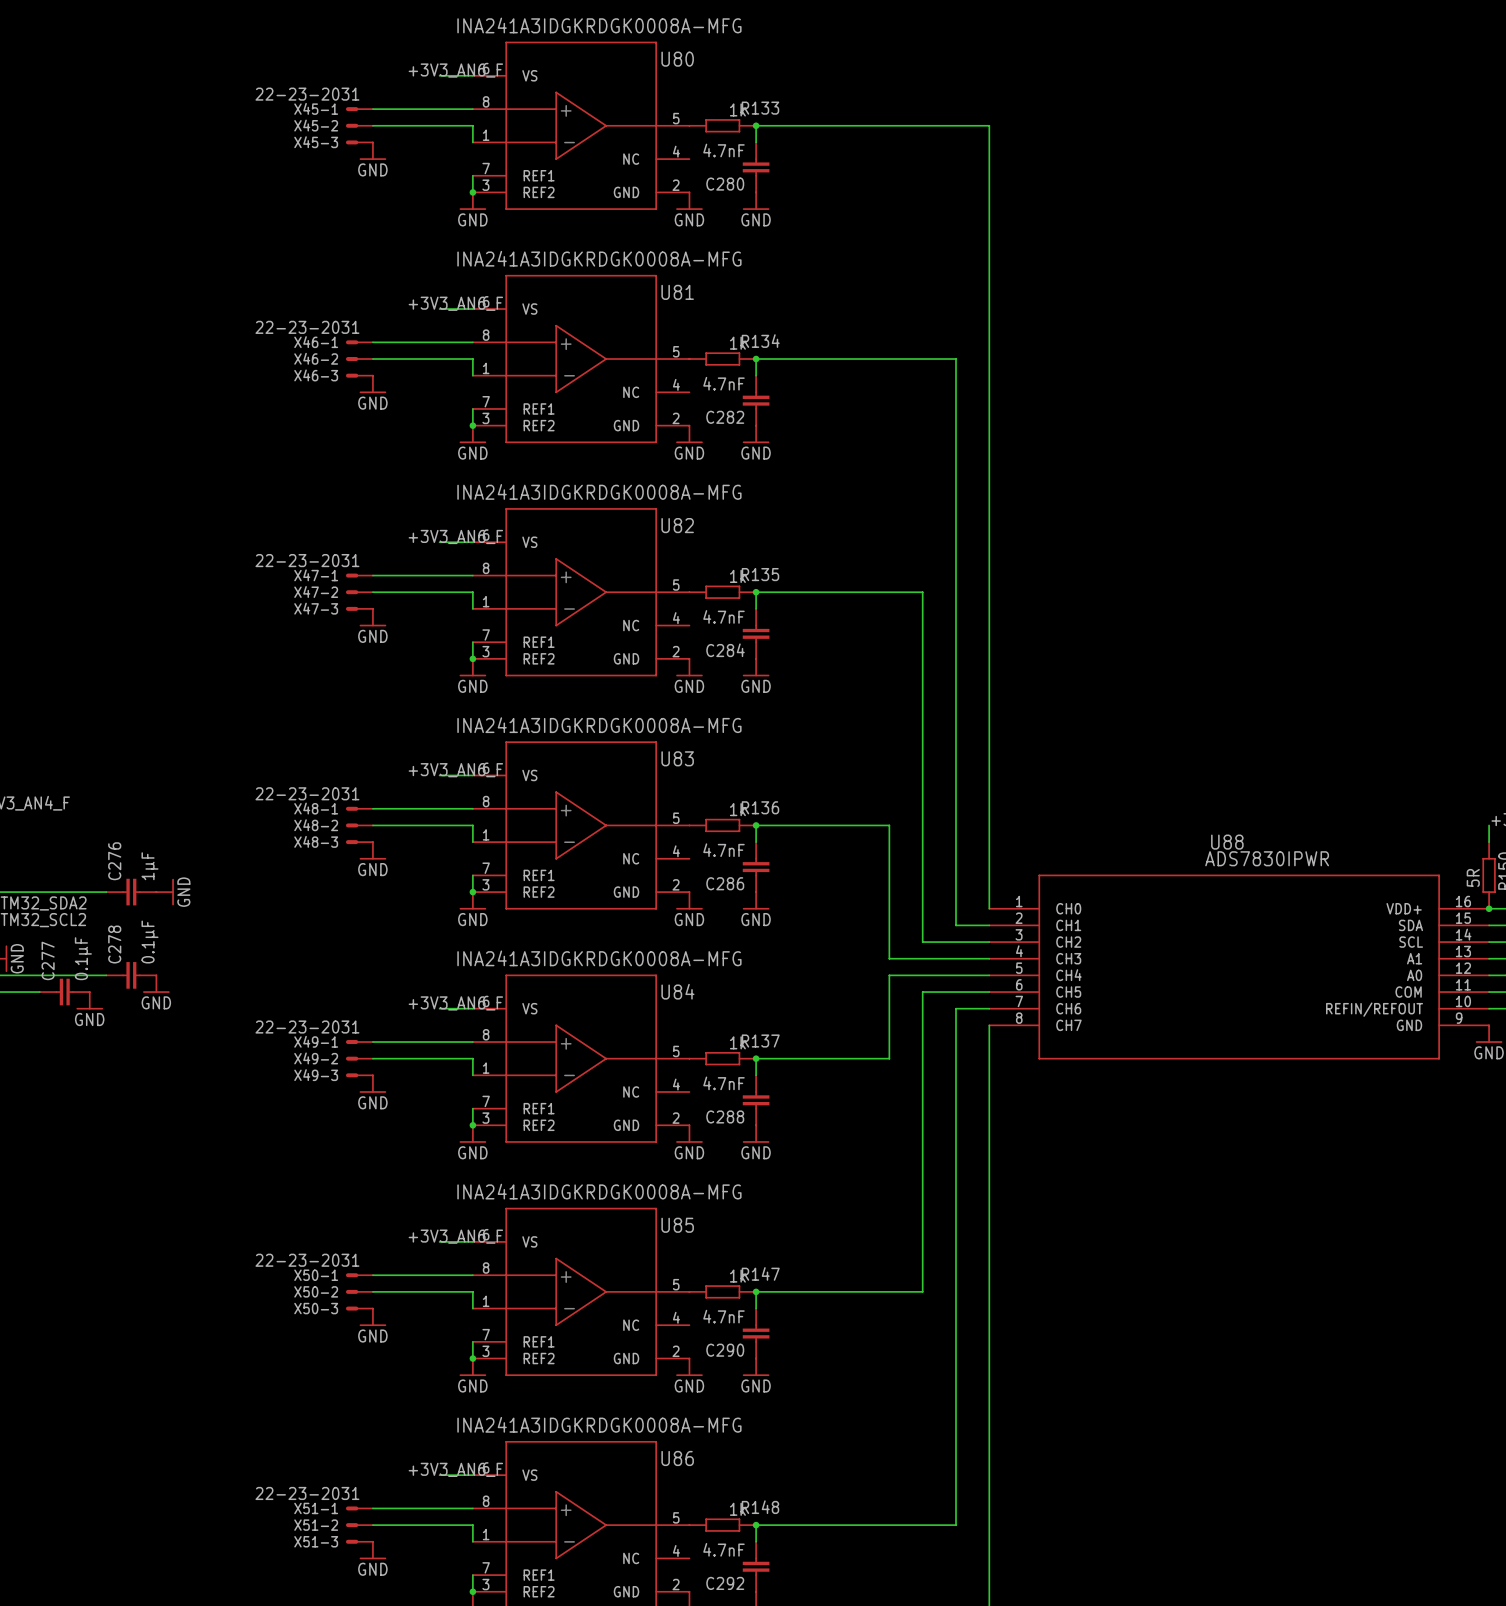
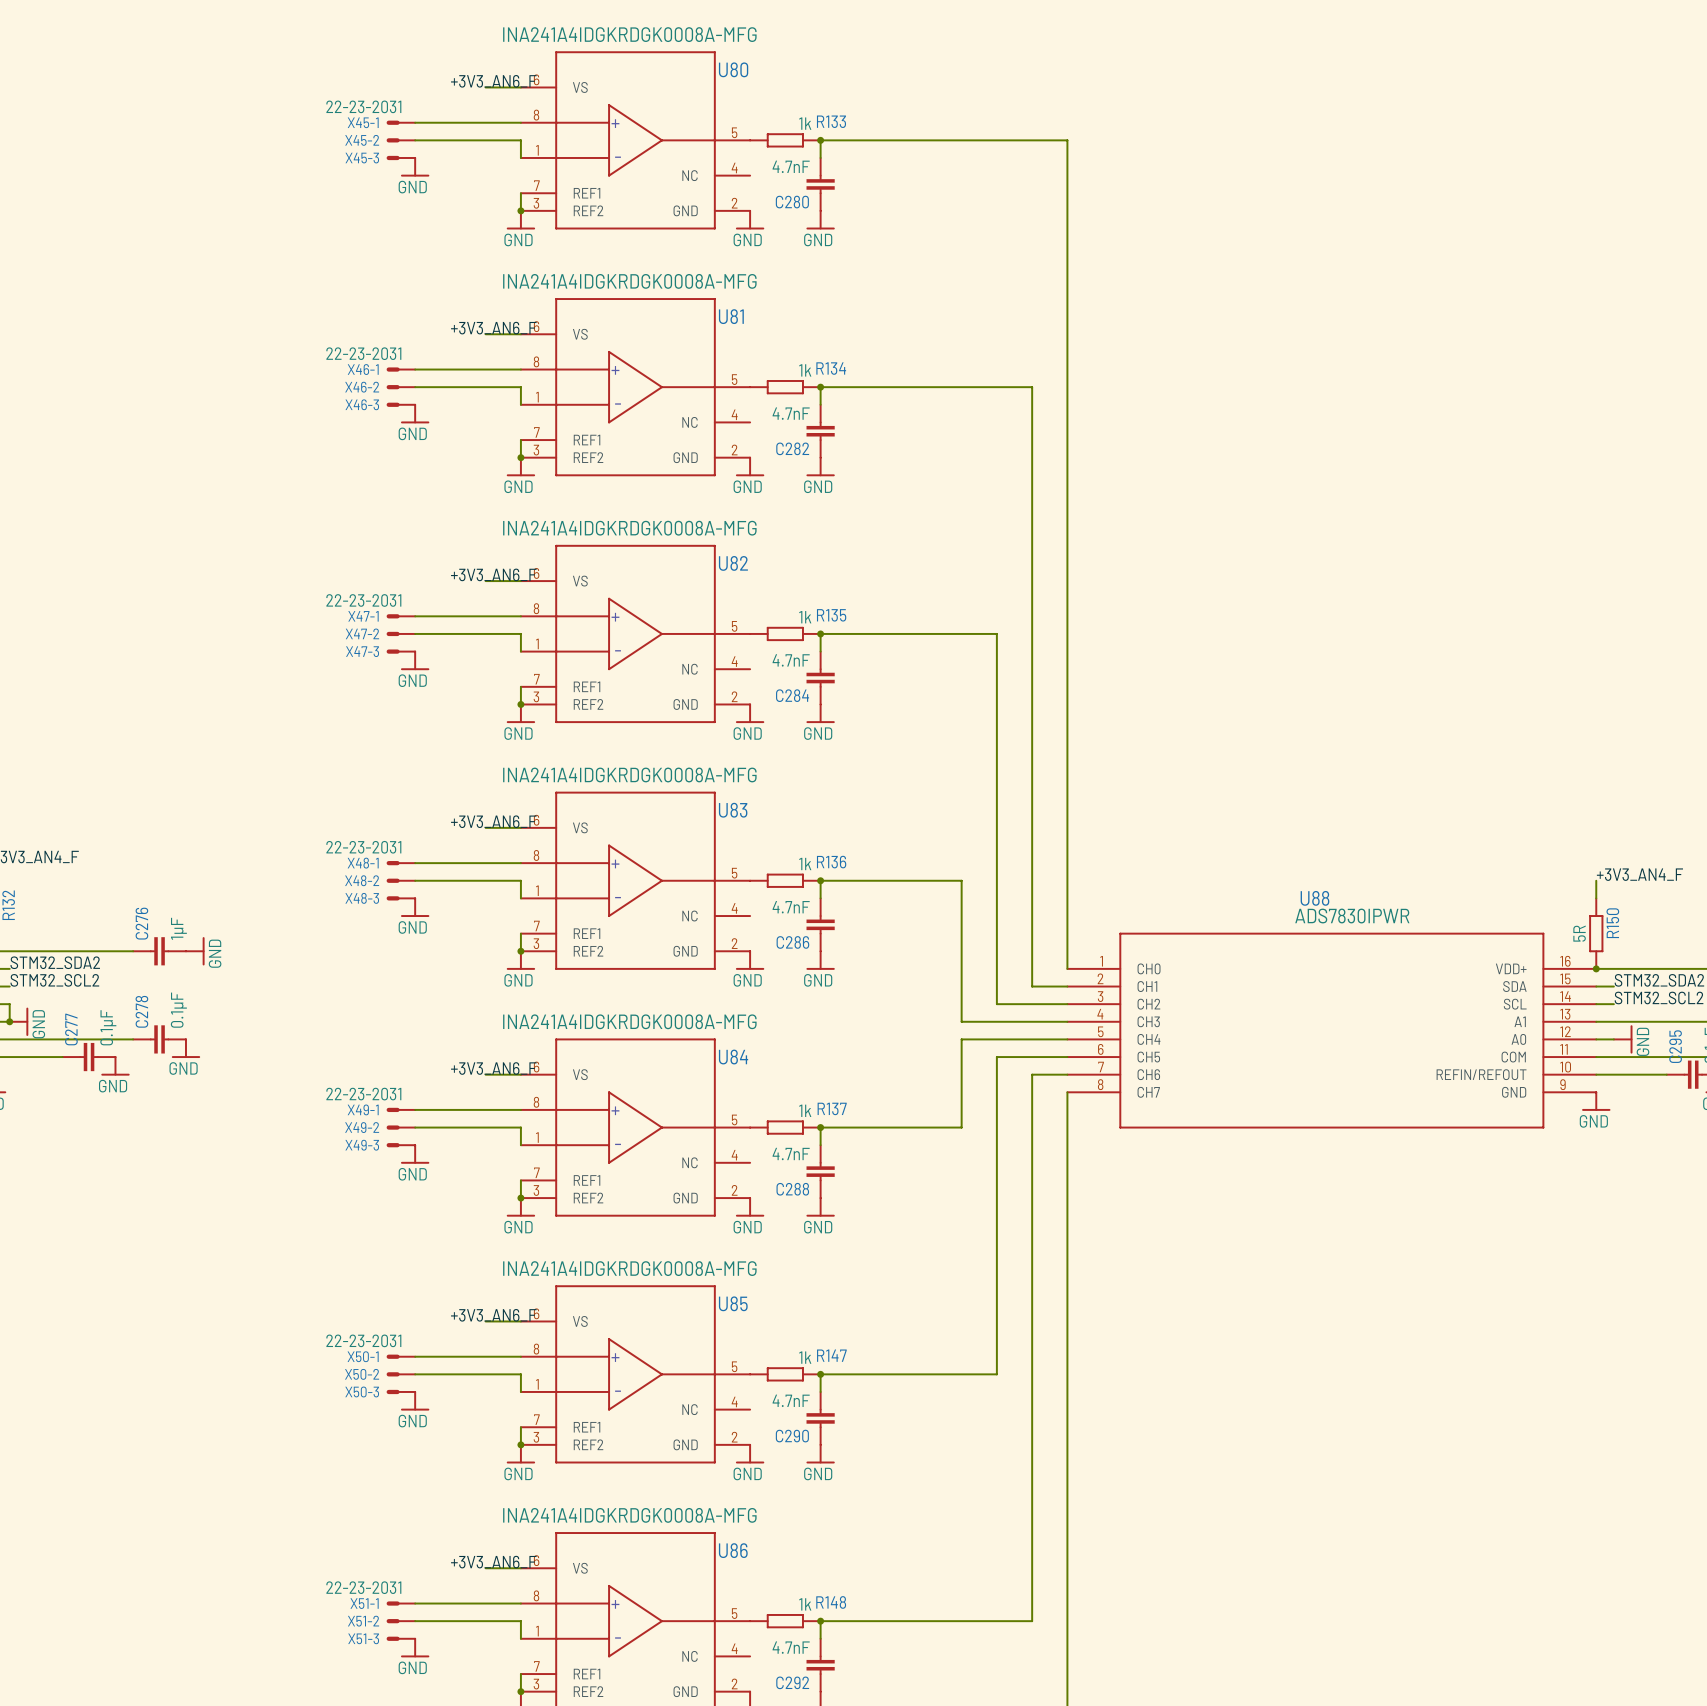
U80 value: INA241A3IDGKRDGK0008A-MFG (599, 25) -> INA241A4IDGKRDGK0008A-MFG (629, 34)
U81 value: INA241A3IDGKRDGK0008A-MFG (599, 258) -> INA241A4IDGKRDGK0008A-MFG (629, 281)
U82 value: INA241A3IDGKRDGK0008A-MFG (599, 491) -> INA241A4IDGKRDGK0008A-MFG (629, 528)
U83 value: INA241A3IDGKRDGK0008A-MFG (599, 725) -> INA241A4IDGKRDGK0008A-MFG (629, 774)
U84 value: INA241A3IDGKRDGK0008A-MFG (599, 958) -> INA241A4IDGKRDGK0008A-MFG (629, 1021)
U85 value: INA241A3IDGKRDGK0008A-MFG (599, 1191) -> INA241A4IDGKRDGK0008A-MFG (629, 1268)
U86 value: INA241A3IDGKRDGK0008A-MFG (599, 1424) -> INA241A4IDGKRDGK0008A-MFG (629, 1515)

